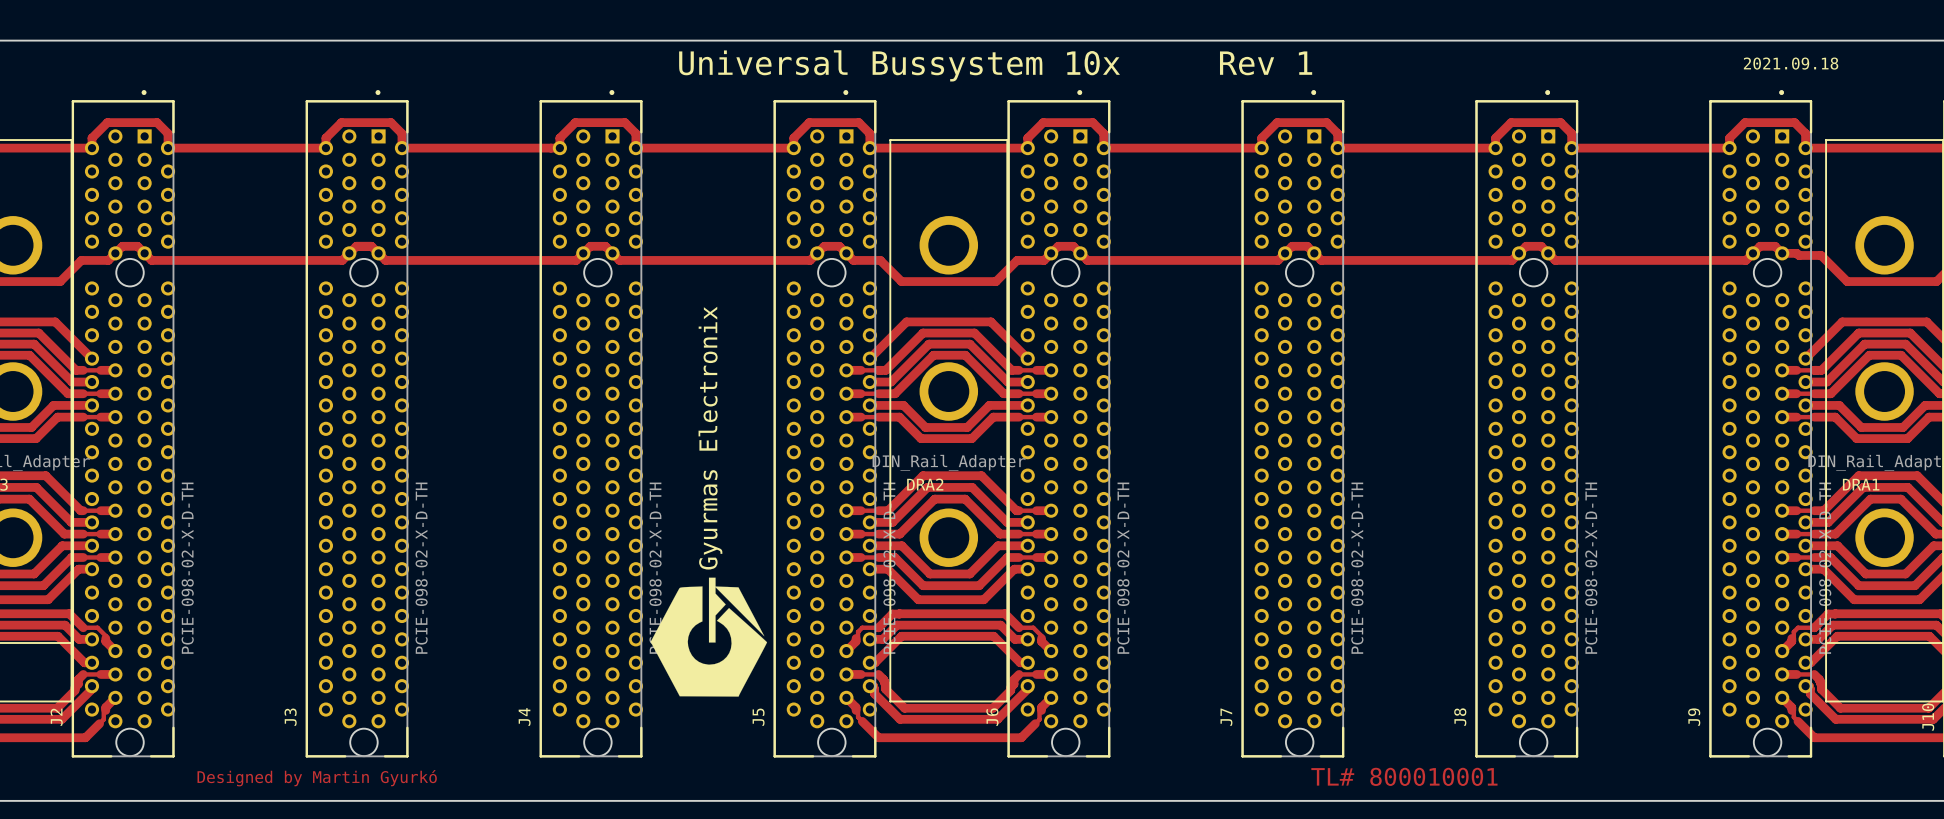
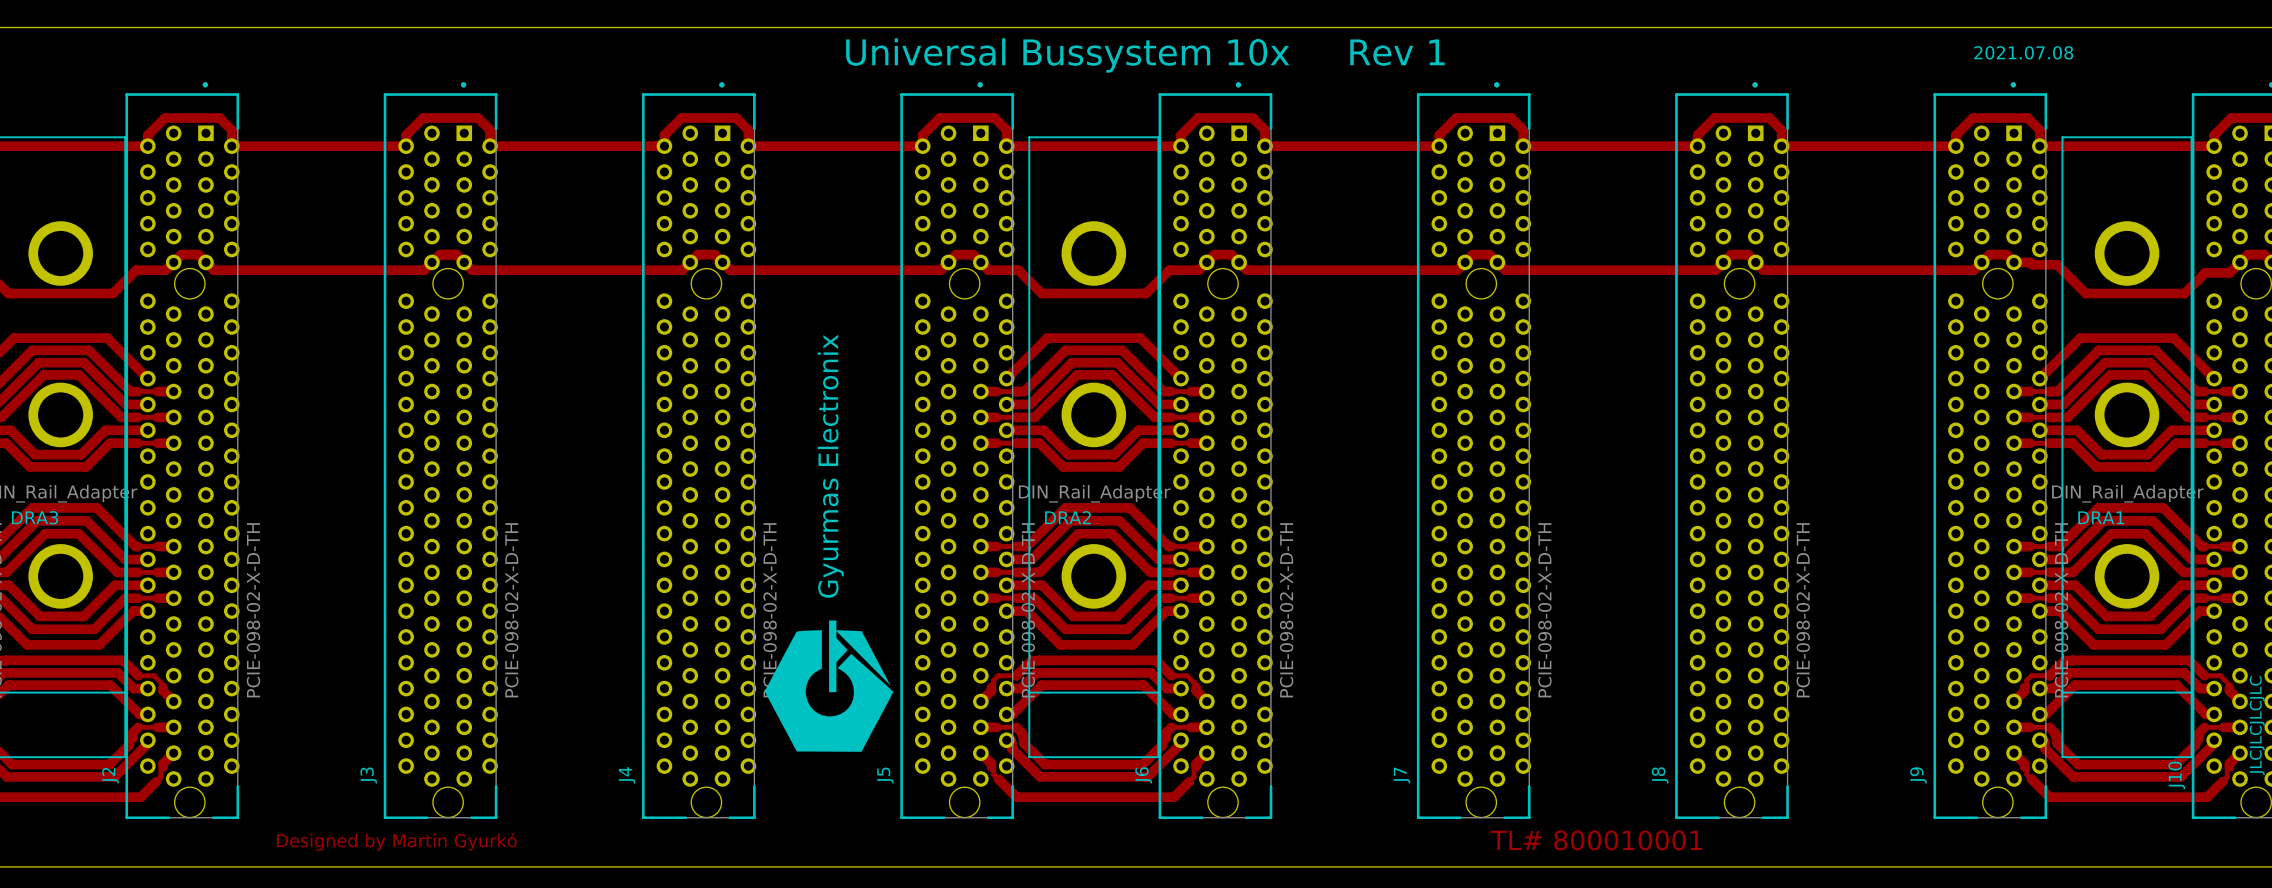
text: 2021.09.18 (1791, 63) -> 2021.07.08 (2023, 52)

